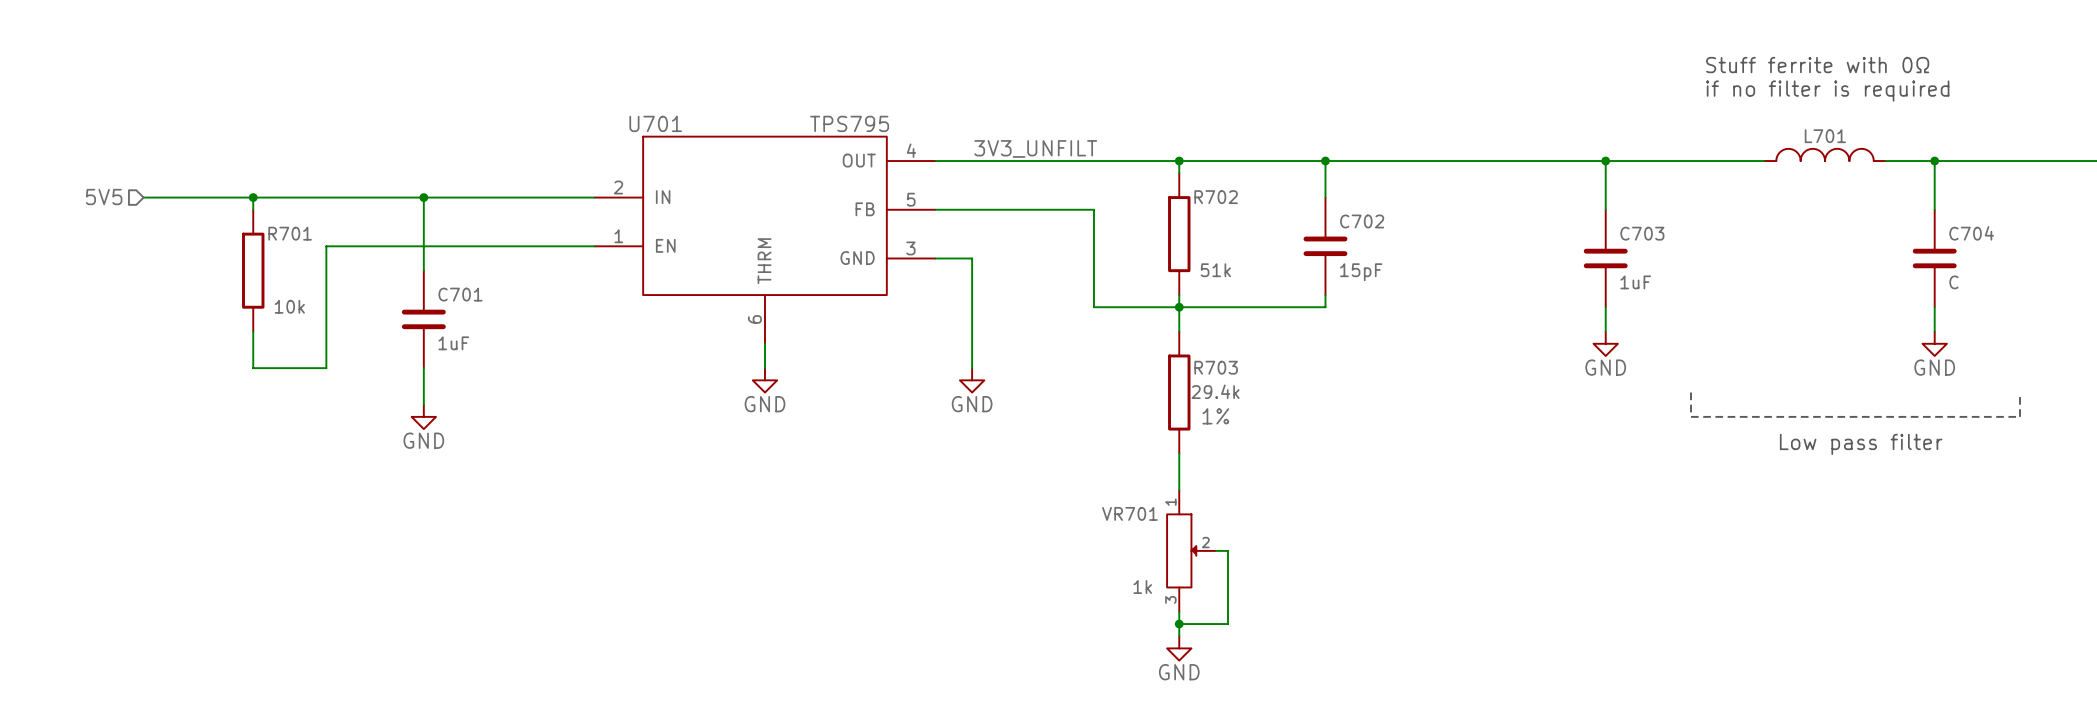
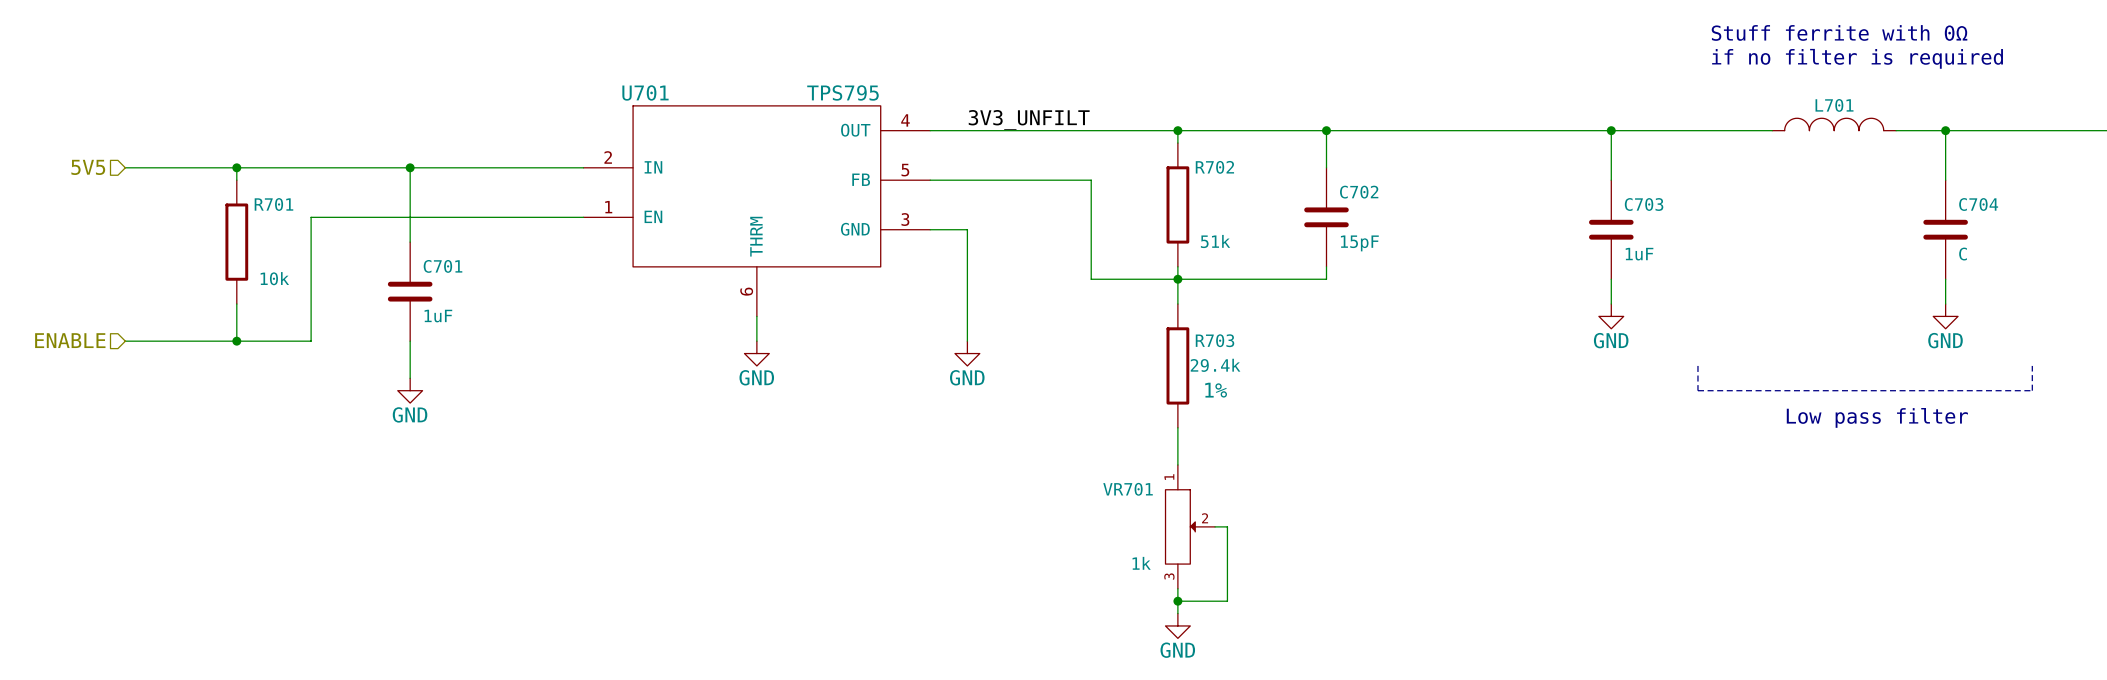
hierarchical label: none -> ENABLE (70, 340)
wire: none -> (125, 341) (236, 341)
junction: none -> (236, 341)

